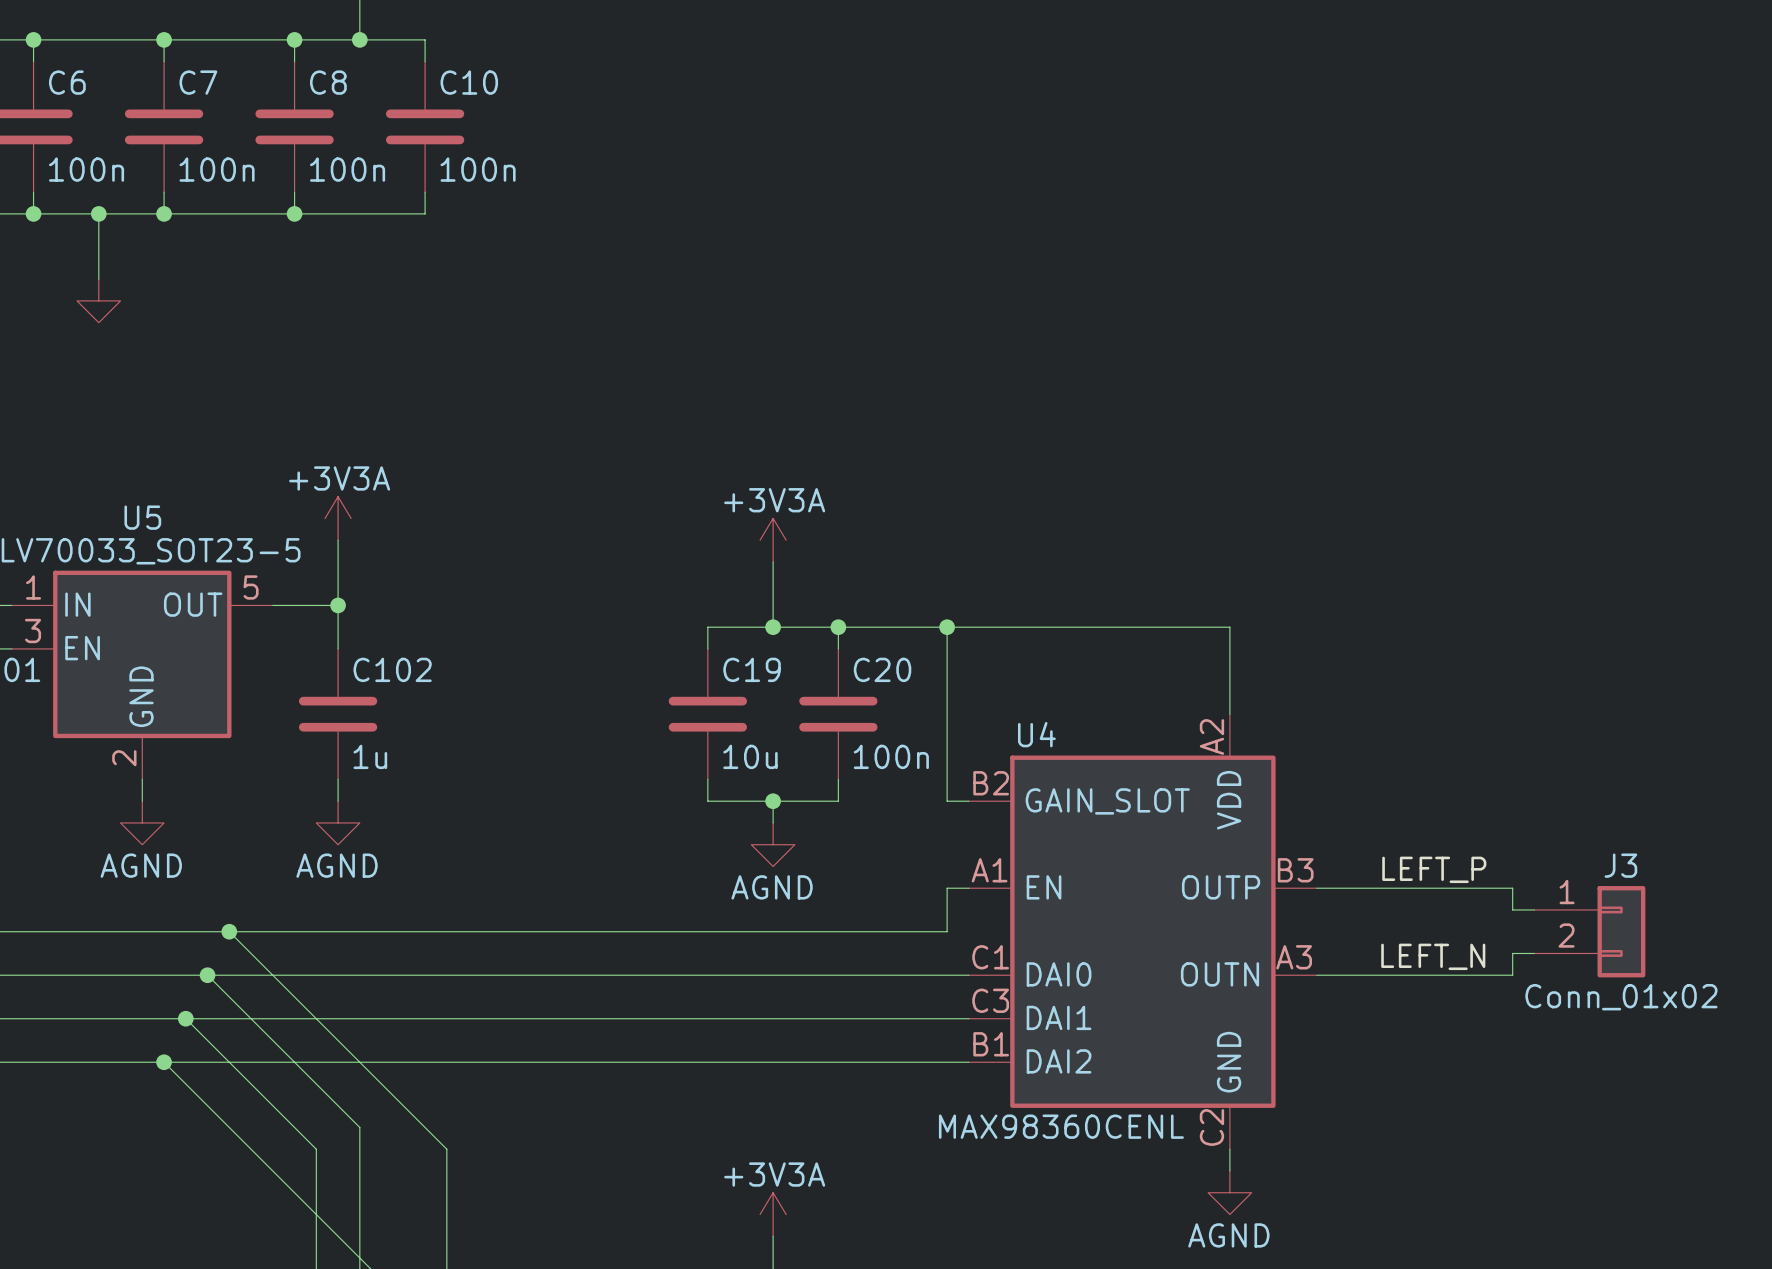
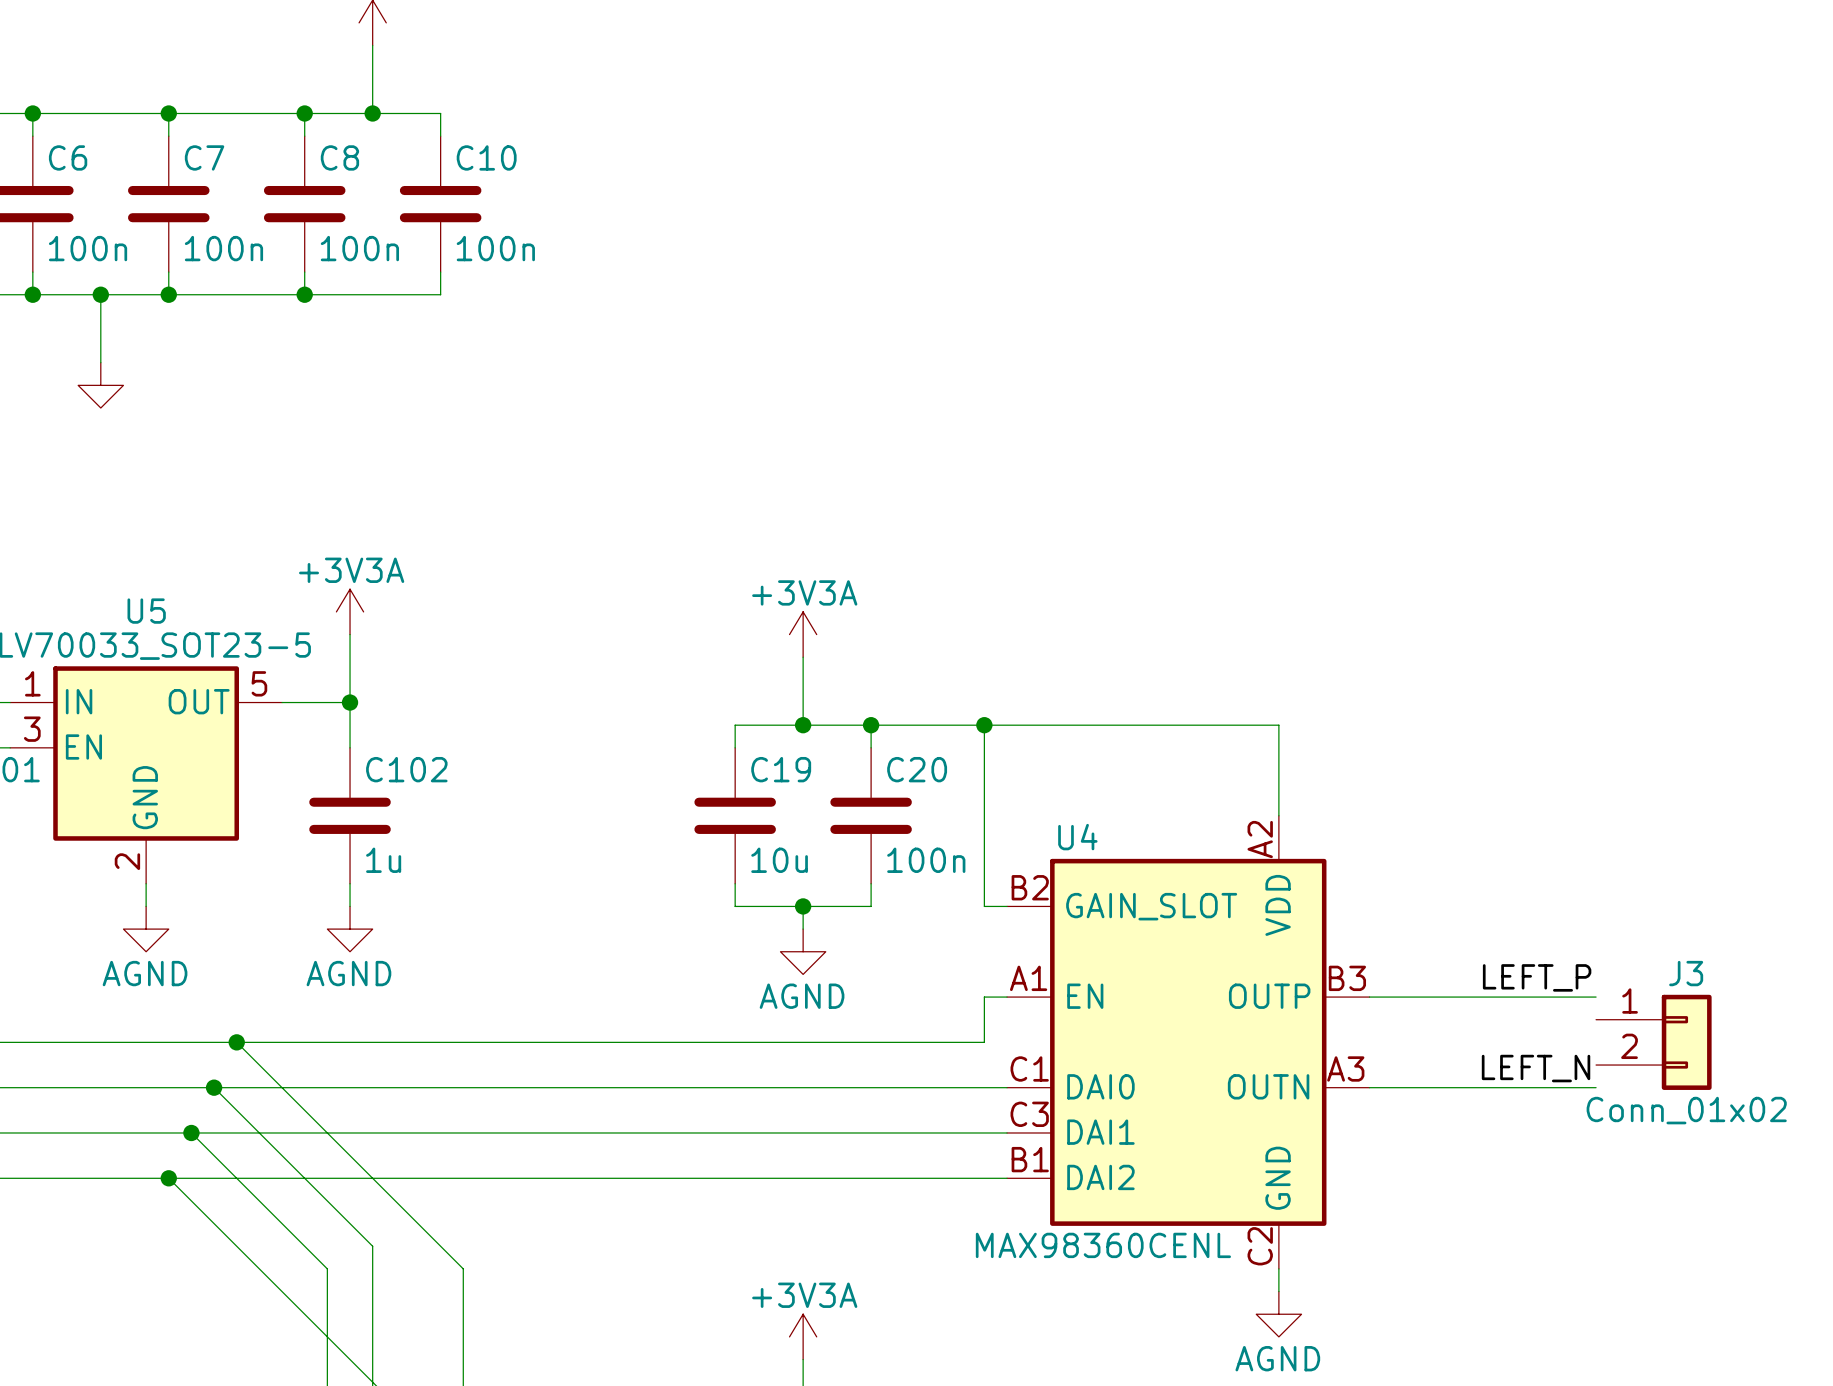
label position: LEFT_P (1434, 869) -> LEFT_P (1537, 977)
wire: (1512, 888) (1512, 909) (1534, 909) -> (1573, 997) (1596, 997)
wire: (1534, 953) (1512, 953) (1512, 975) -> (1596, 1087) (1573, 1087)
label position: LEFT_N (1433, 956) -> LEFT_N (1536, 1068)

